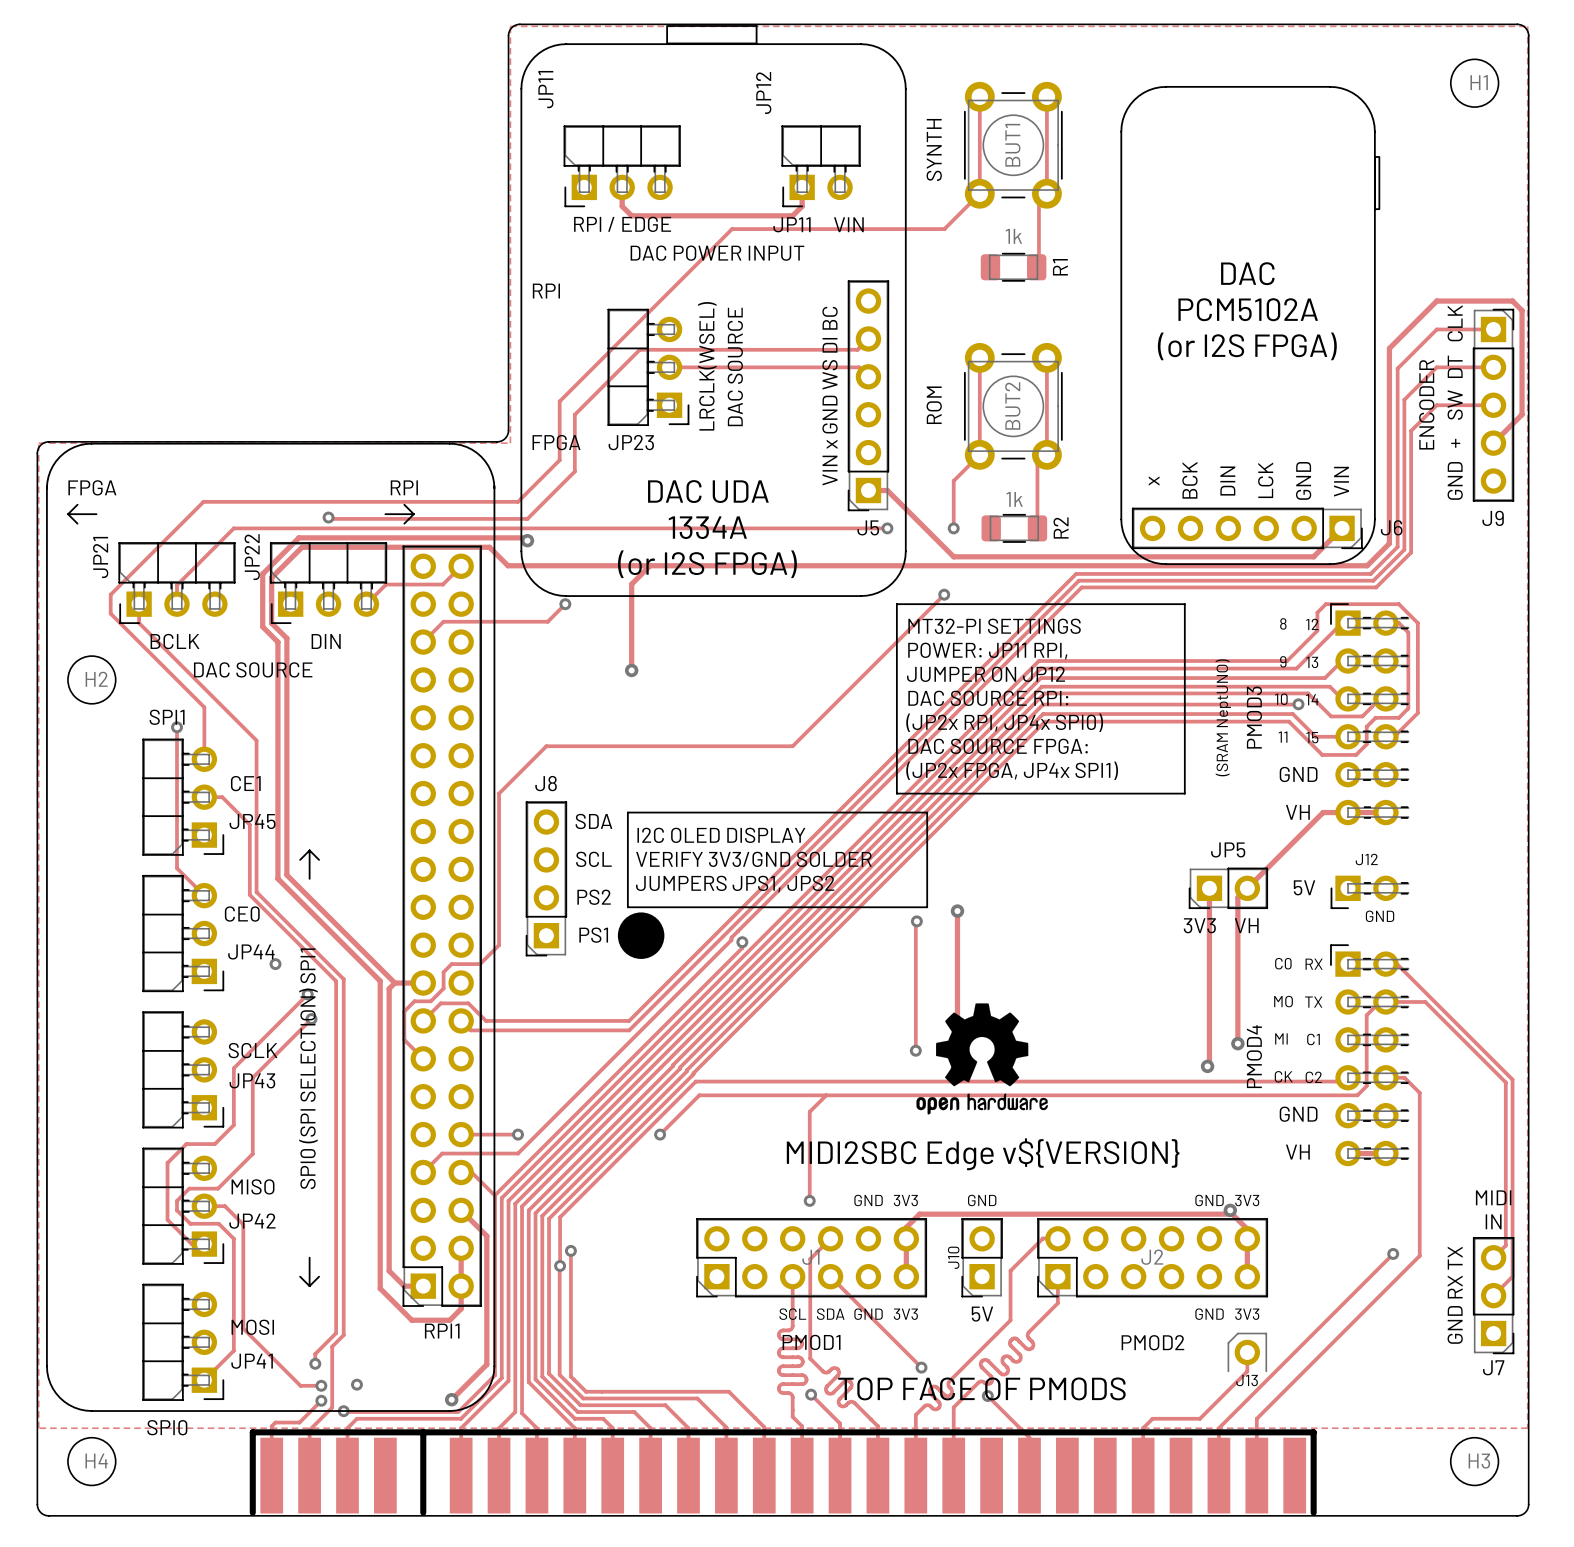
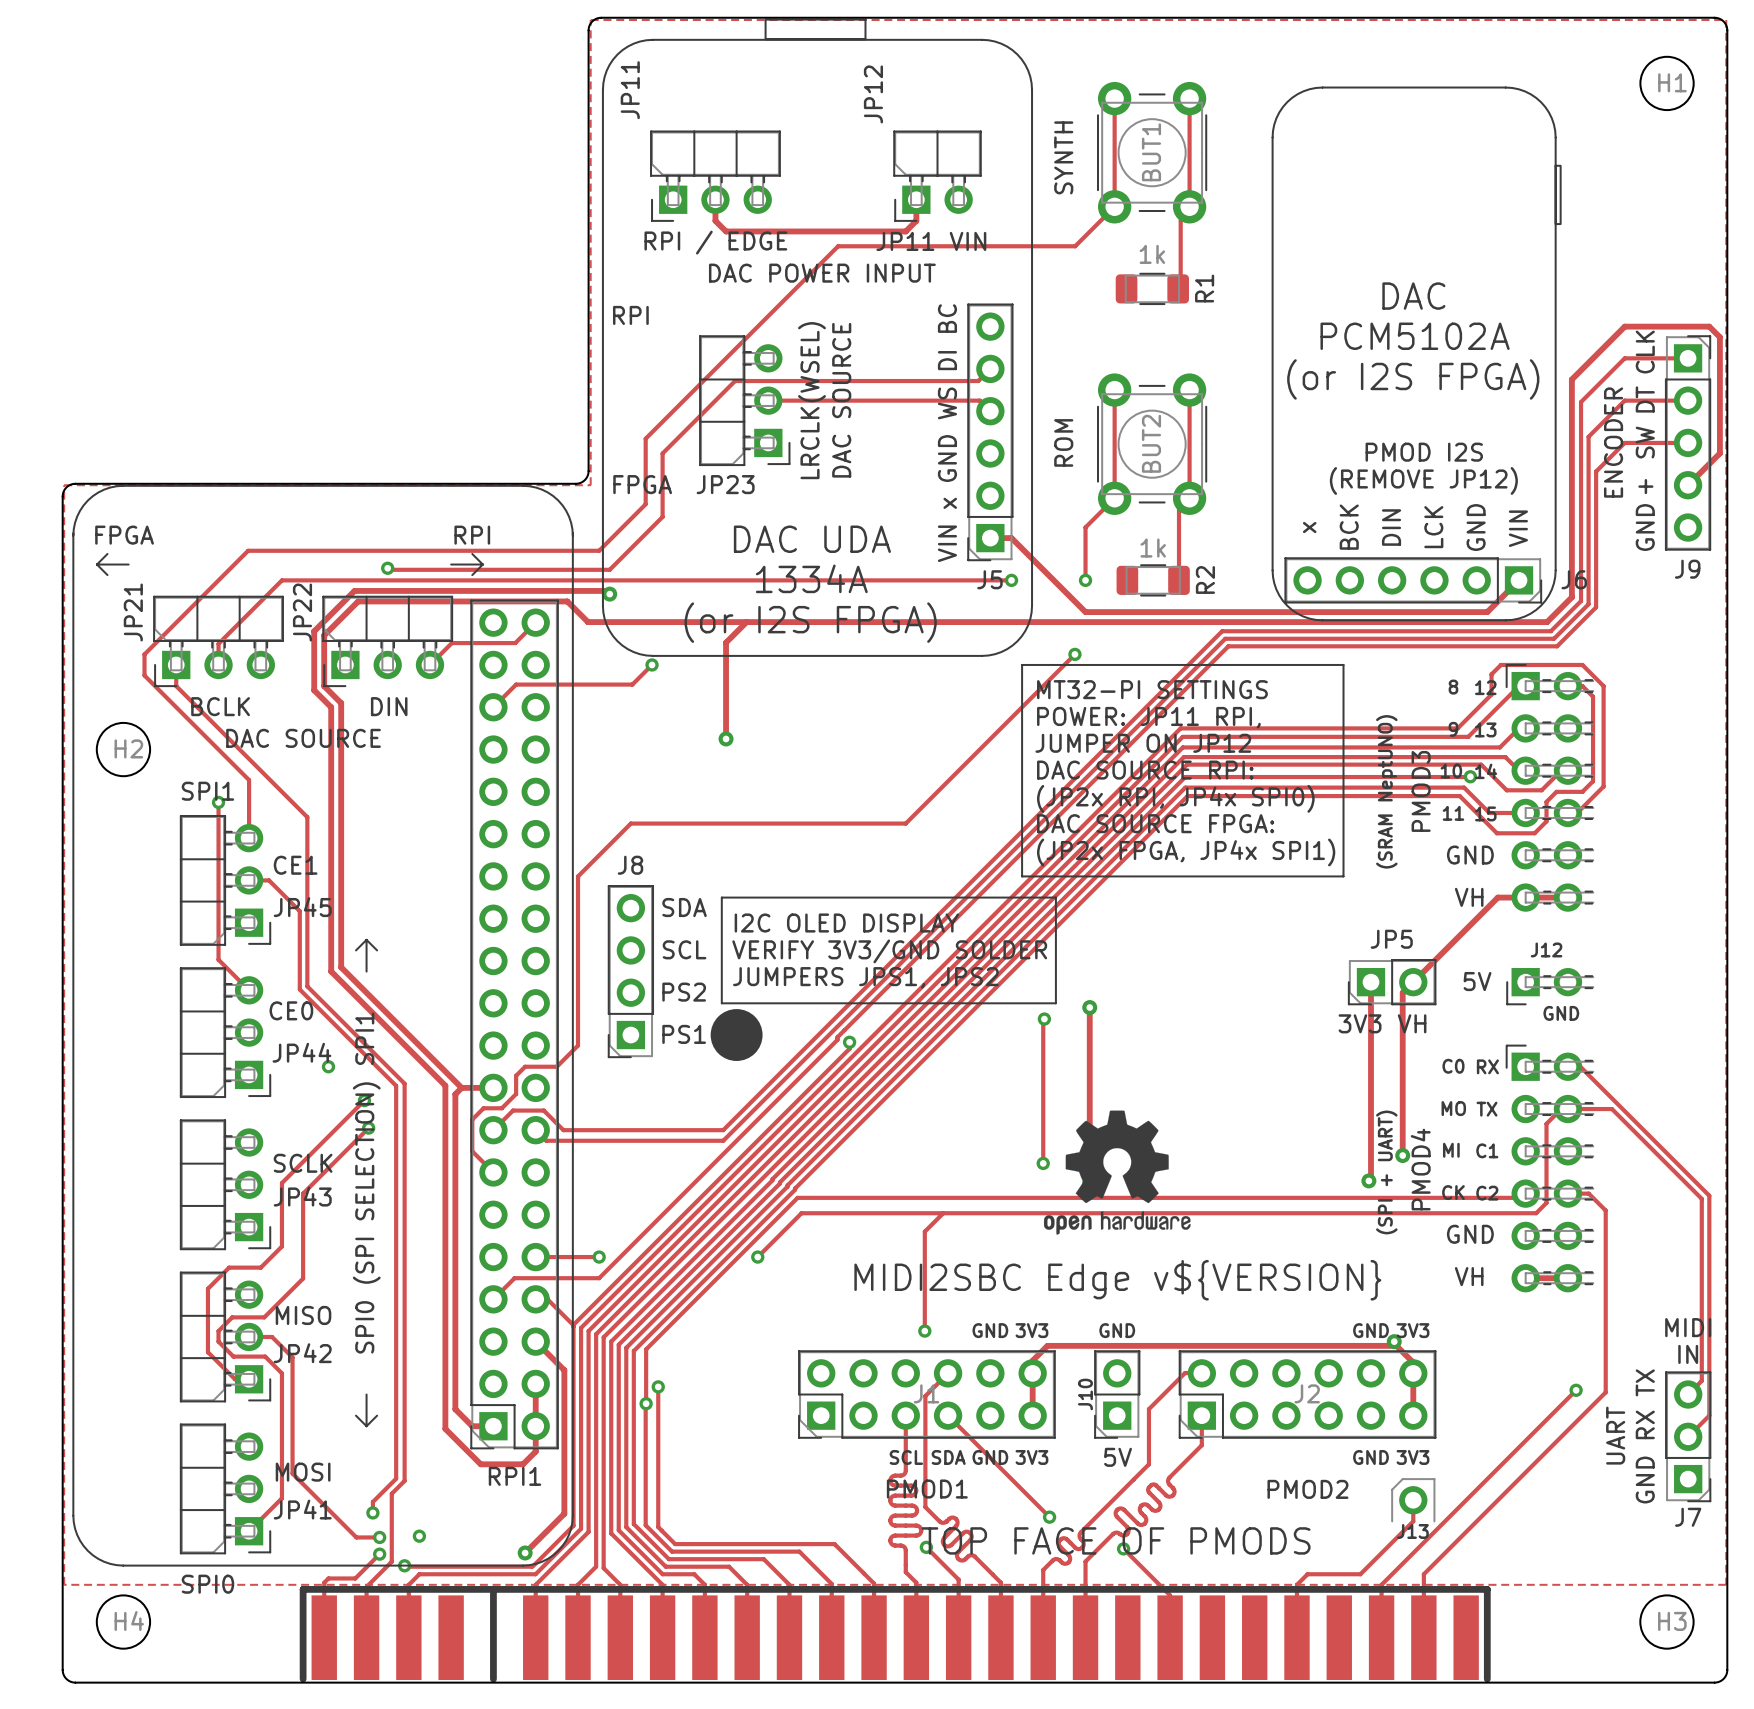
text: none -> PMOD I2S (1424, 452)
text: none -> (REMOVE JP12) (1423, 480)
text: none -> (SPI + UART) (1386, 1172)
text: none -> UART (1615, 1435)

